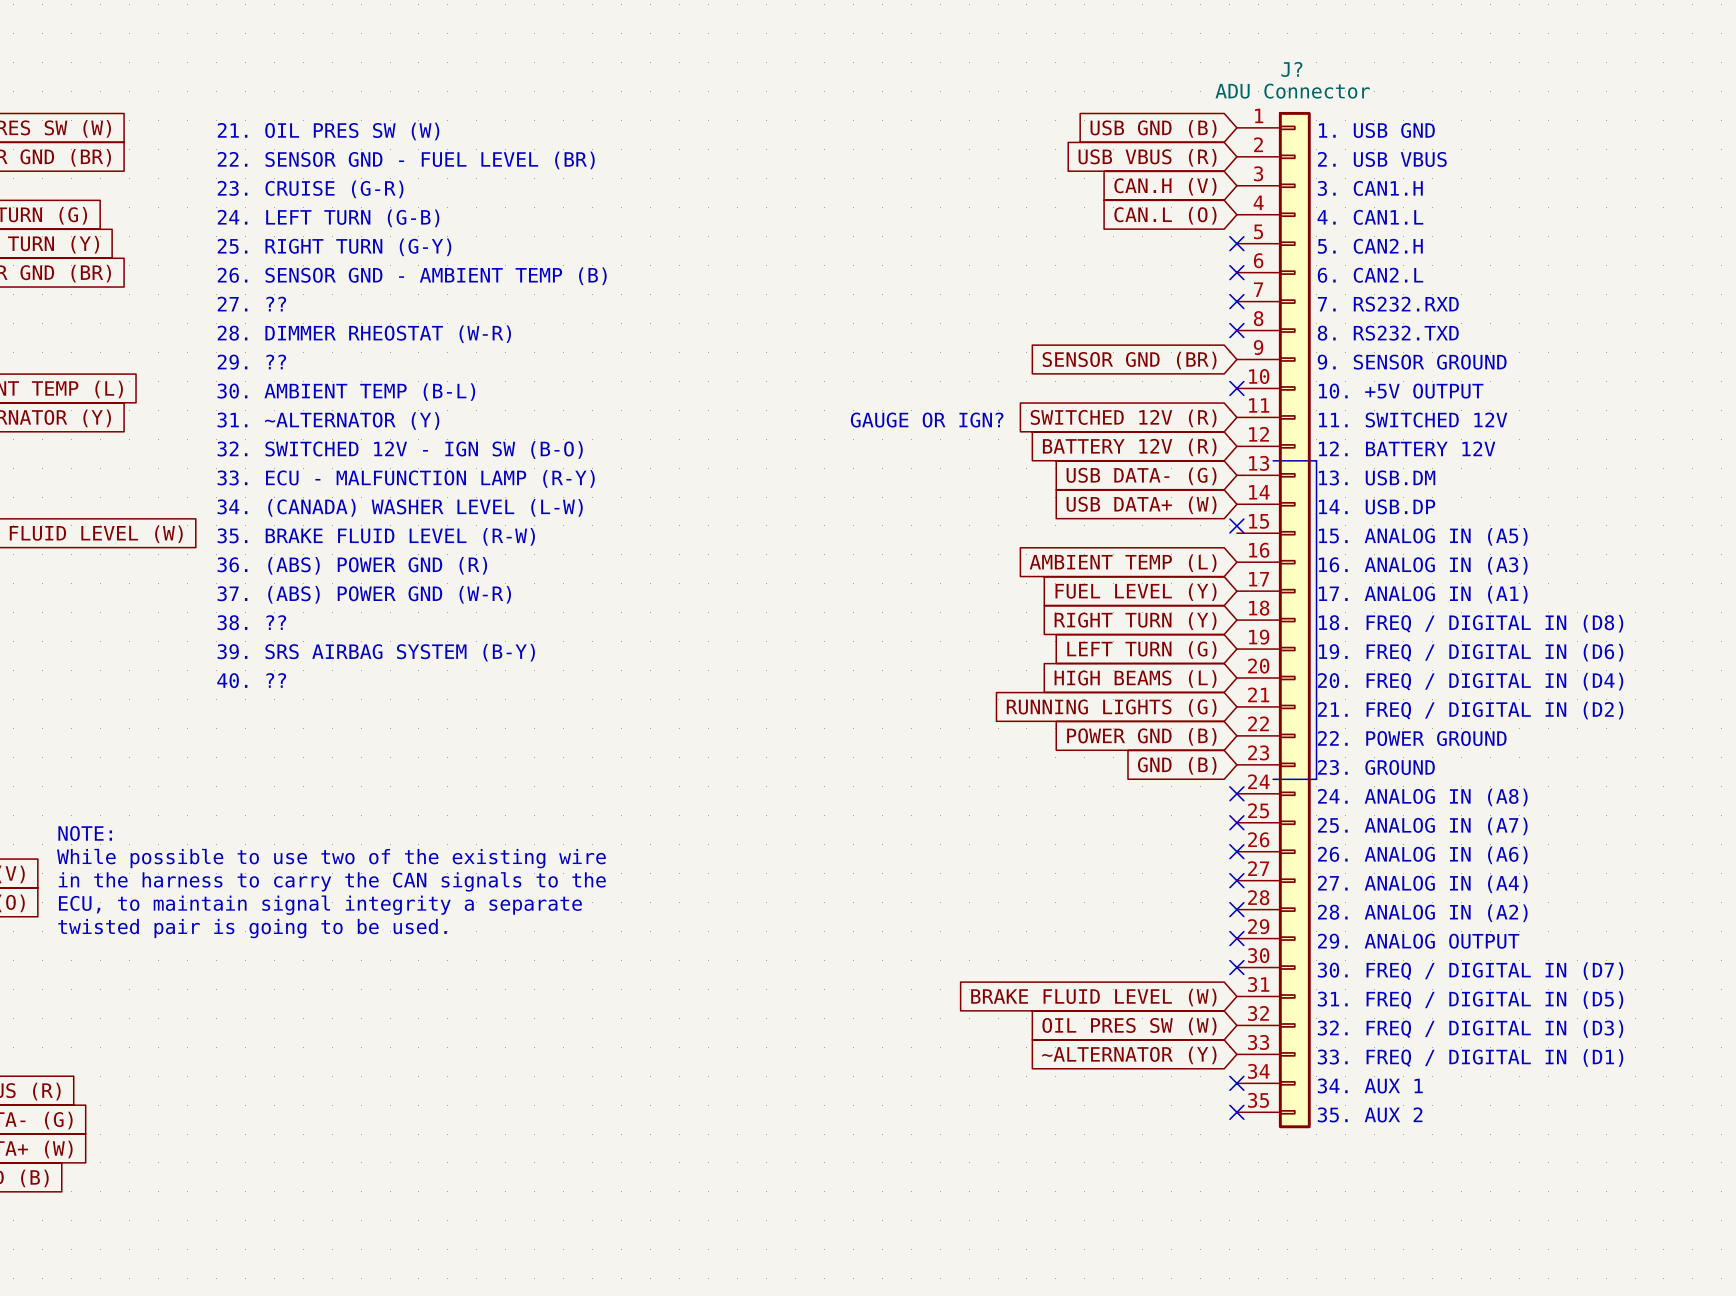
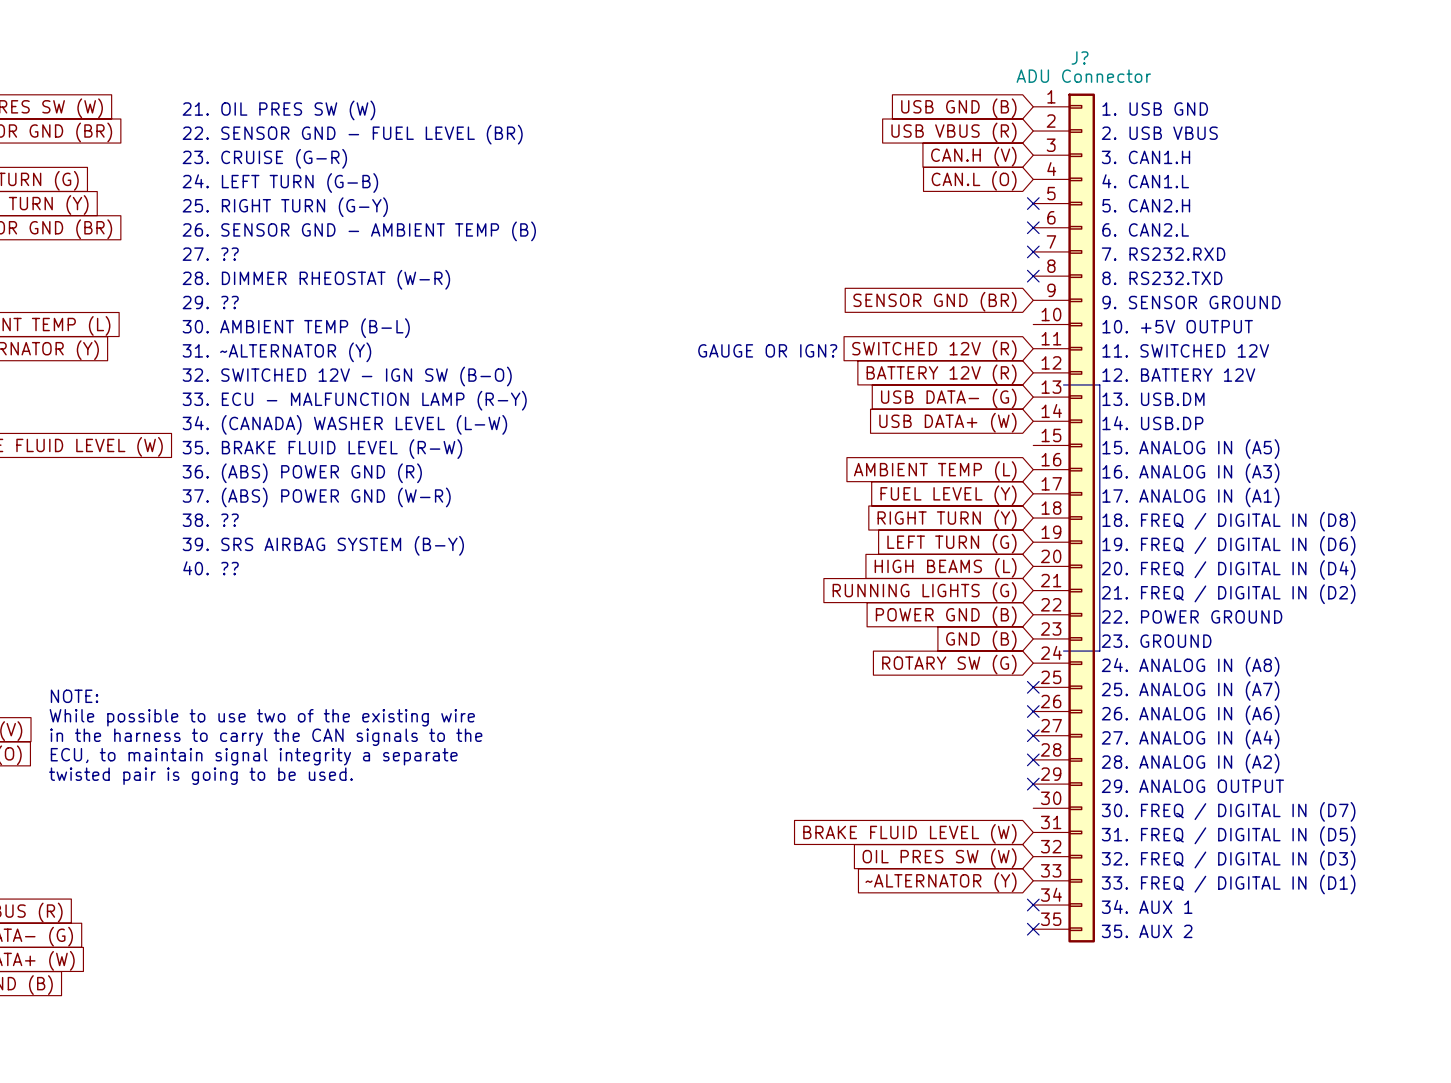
no-connect mark: (1236, 388) -> none
no-connect mark: (1236, 525) -> none
no-connect mark: (1236, 793) -> none
global label: none -> ROTARY SW (G) (949, 664)
no-connect mark: (1236, 967) -> none

